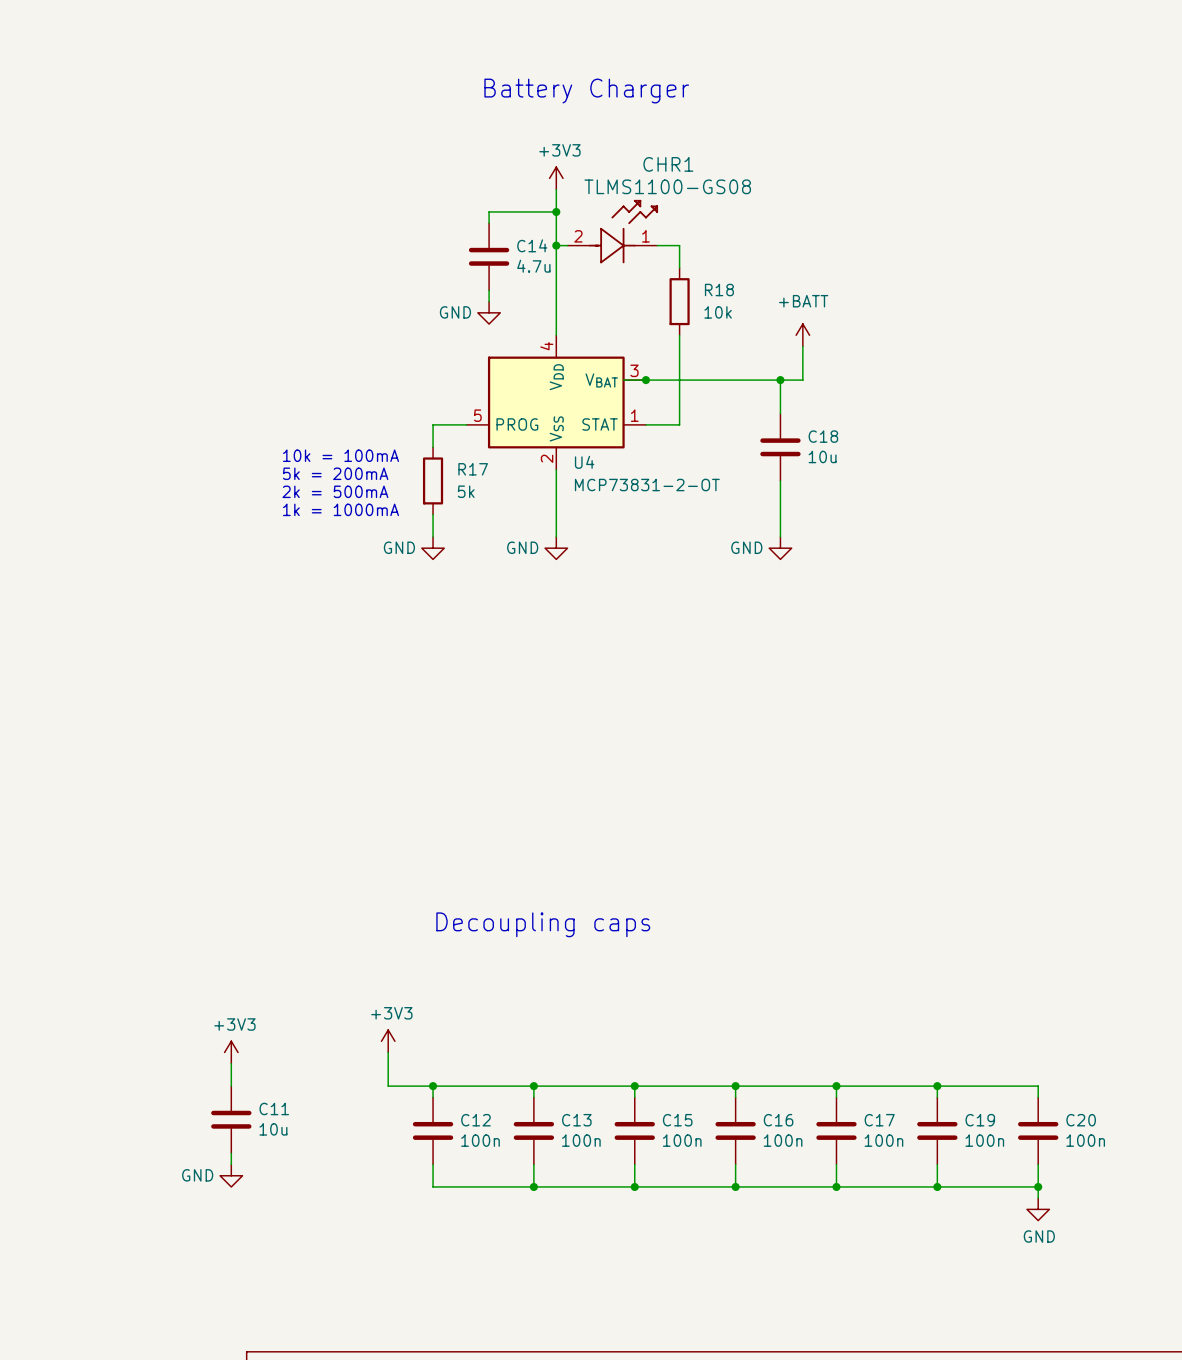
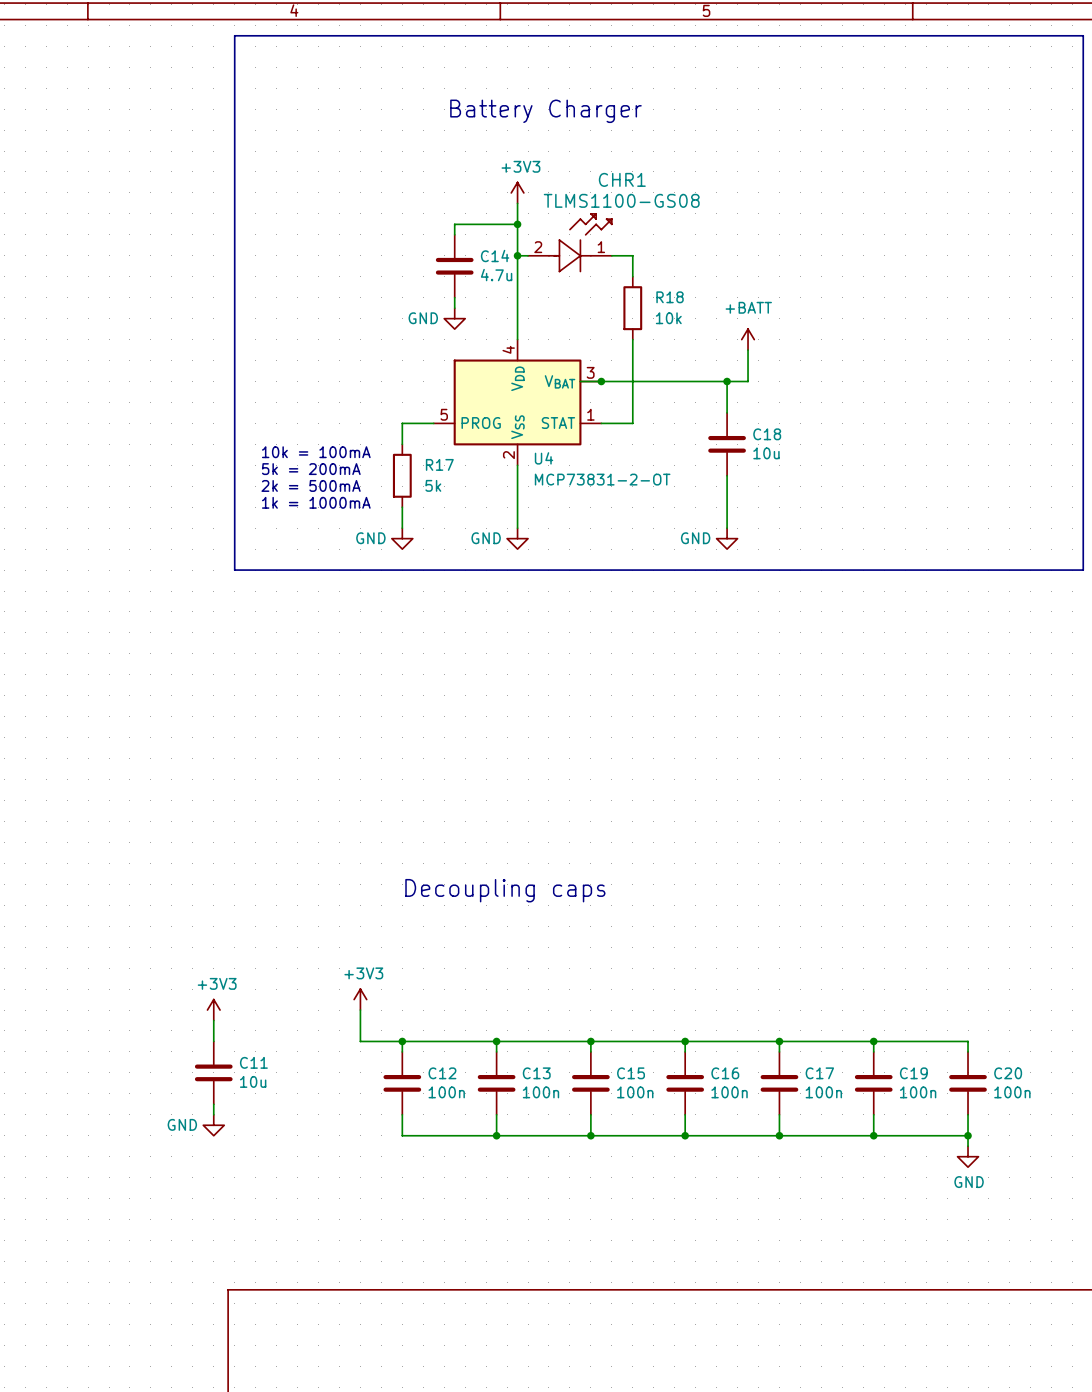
line: none -> (234, 35) (1083, 35) (1083, 570) (234, 570) (234, 35)

